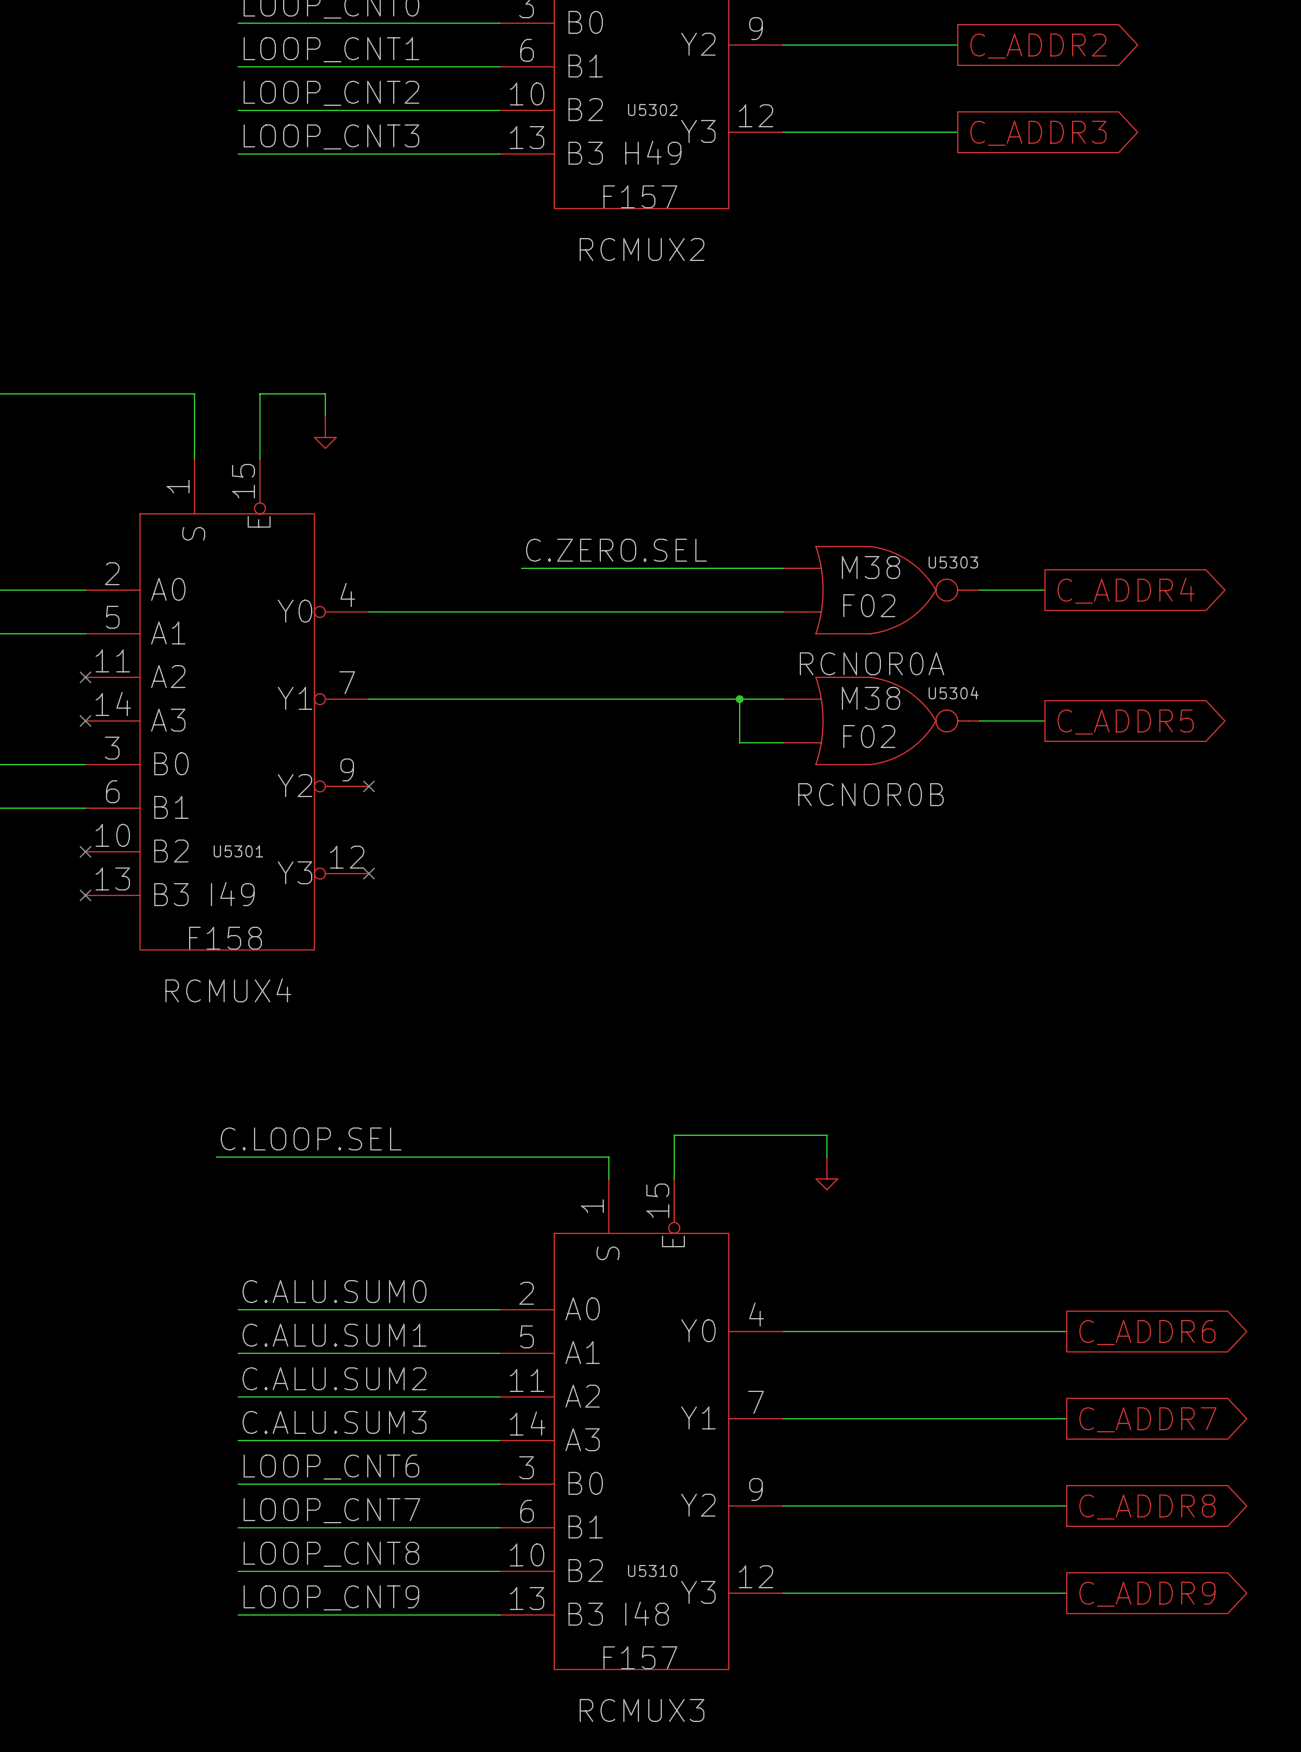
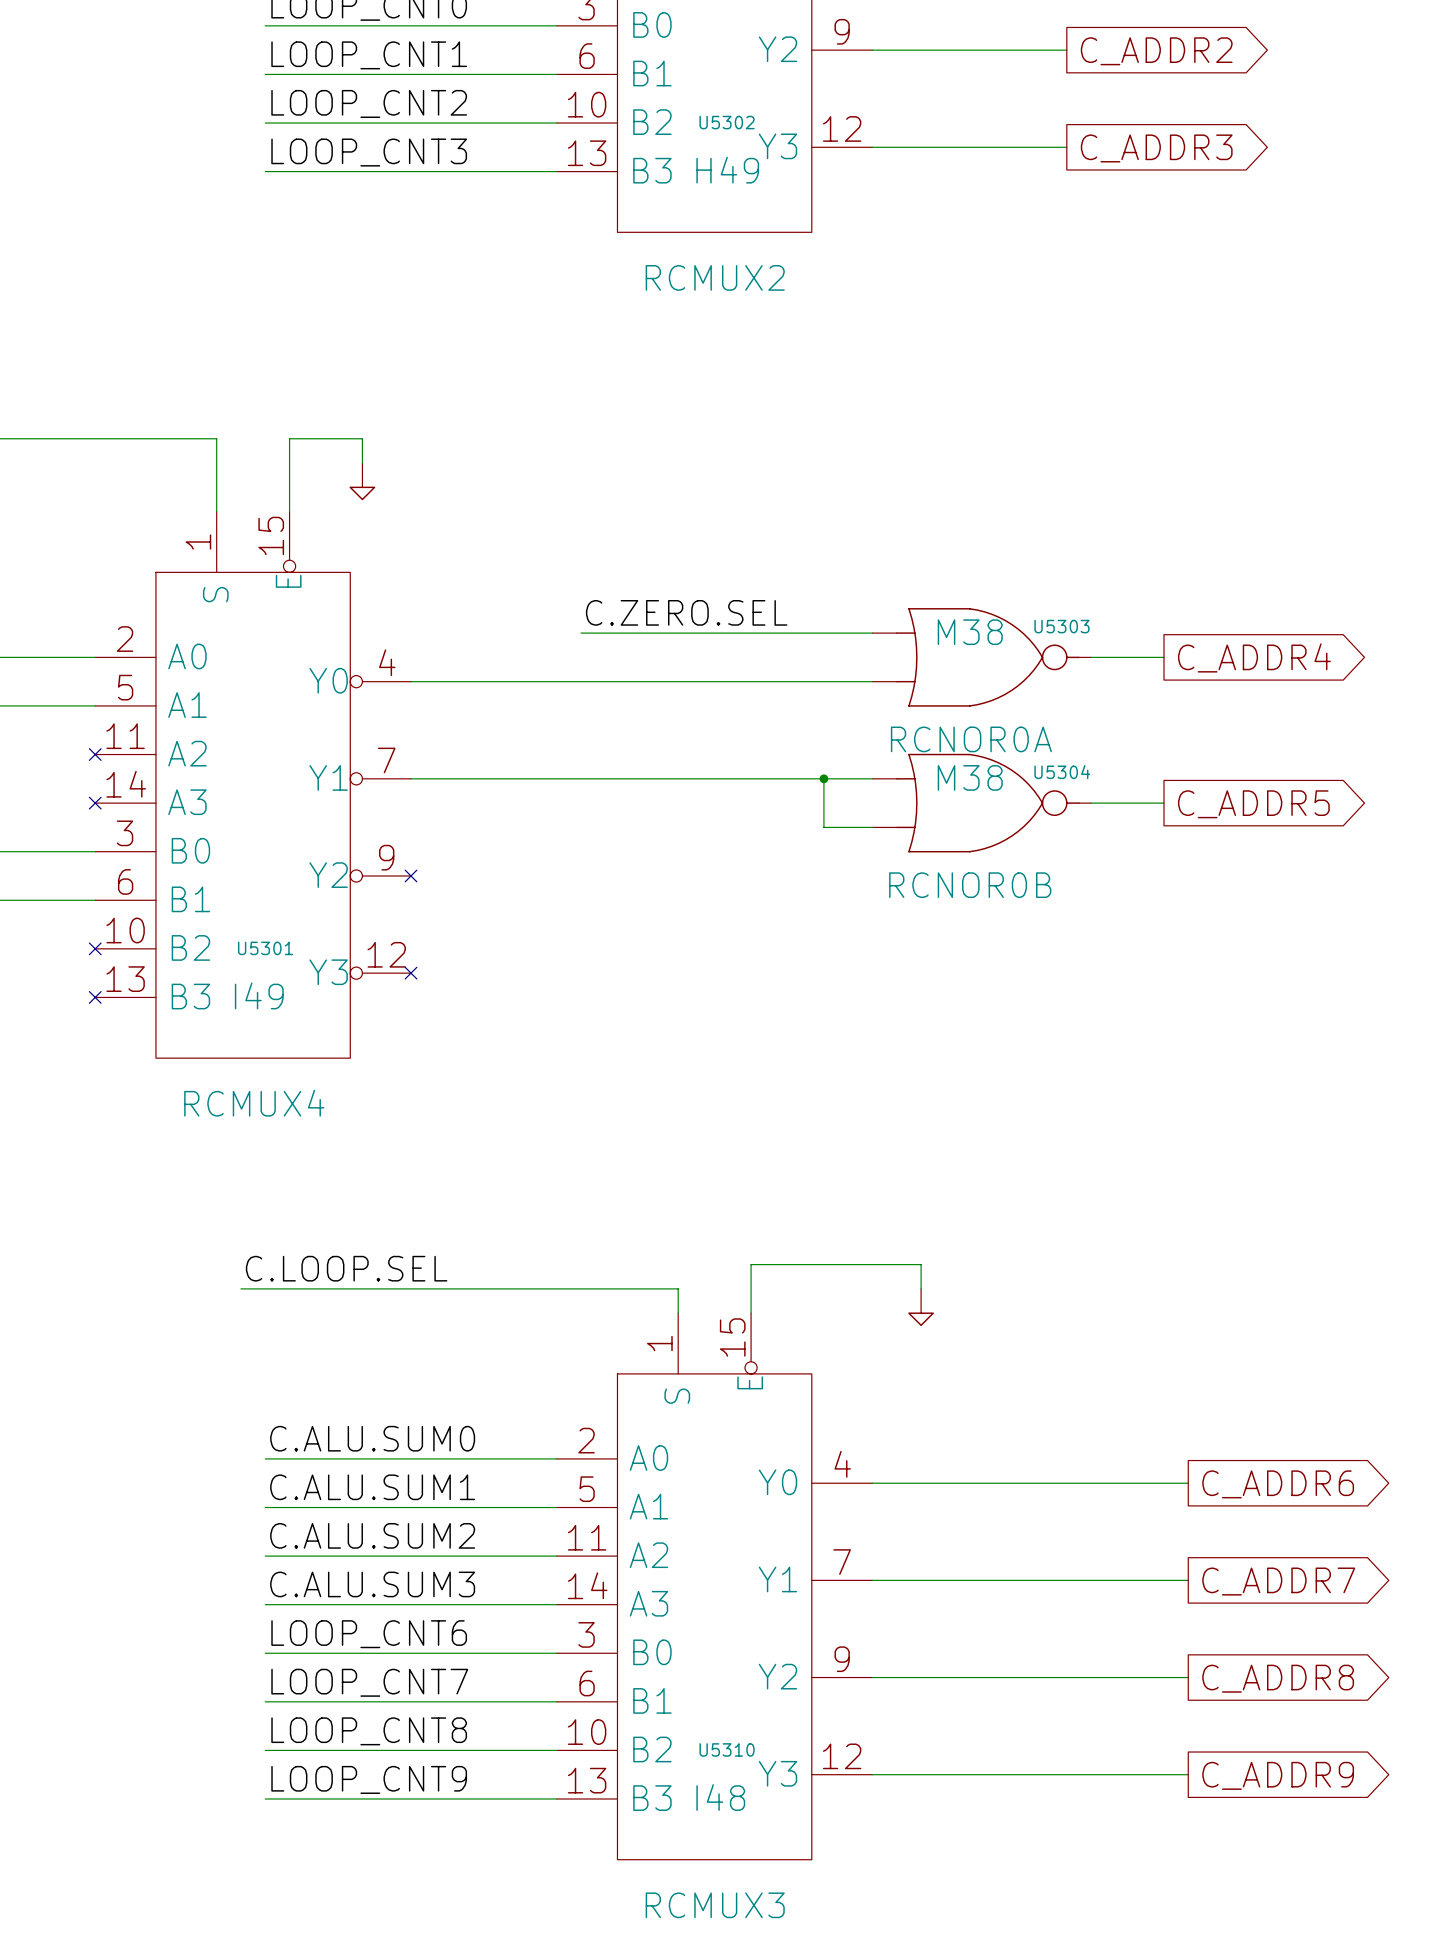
U5302 value: F157 (640, 196) -> none
U5303 value: F02 (869, 605) -> none
U5304 value: F02 (869, 736) -> none
U5301 value: F158 (225, 938) -> none
U5310 value: F157 (640, 1657) -> none

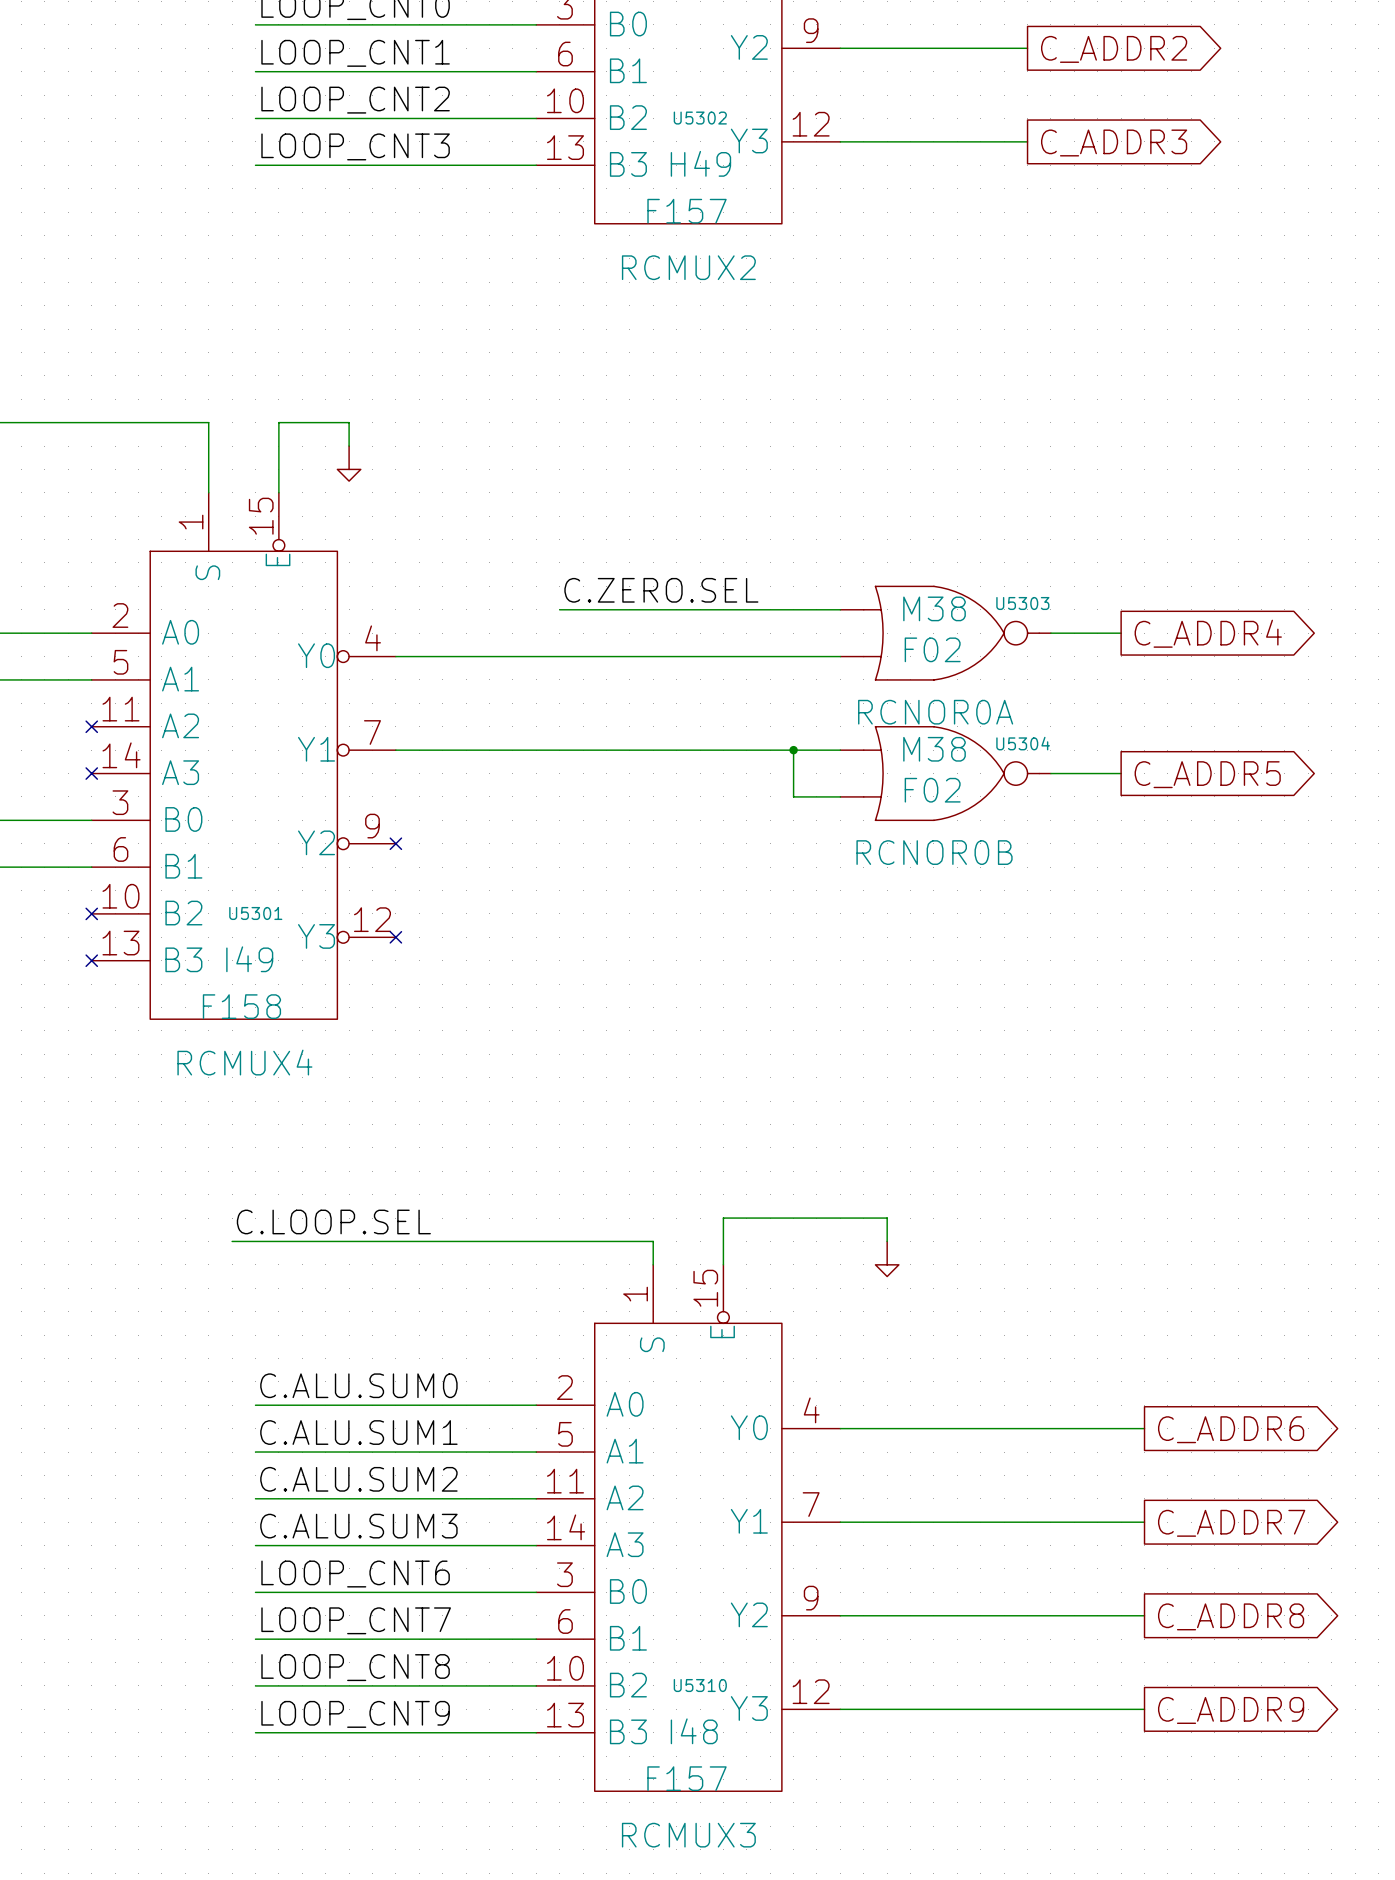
U5302 value: none -> F157 (687, 211)
U5303 value: none -> F02 (932, 649)
U5304 value: none -> F02 (932, 790)
U5301 value: none -> F158 (241, 1006)
U5310 value: none -> F157 (687, 1778)

